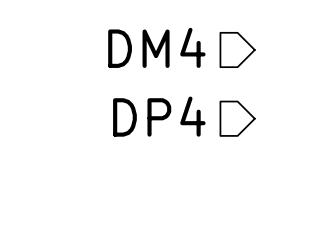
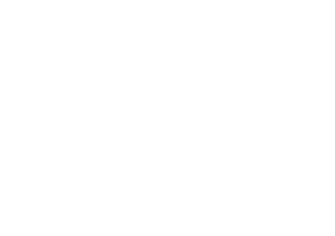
hierarchical label: DM4 (156, 47) -> none
hierarchical label: DP4 (159, 116) -> none

